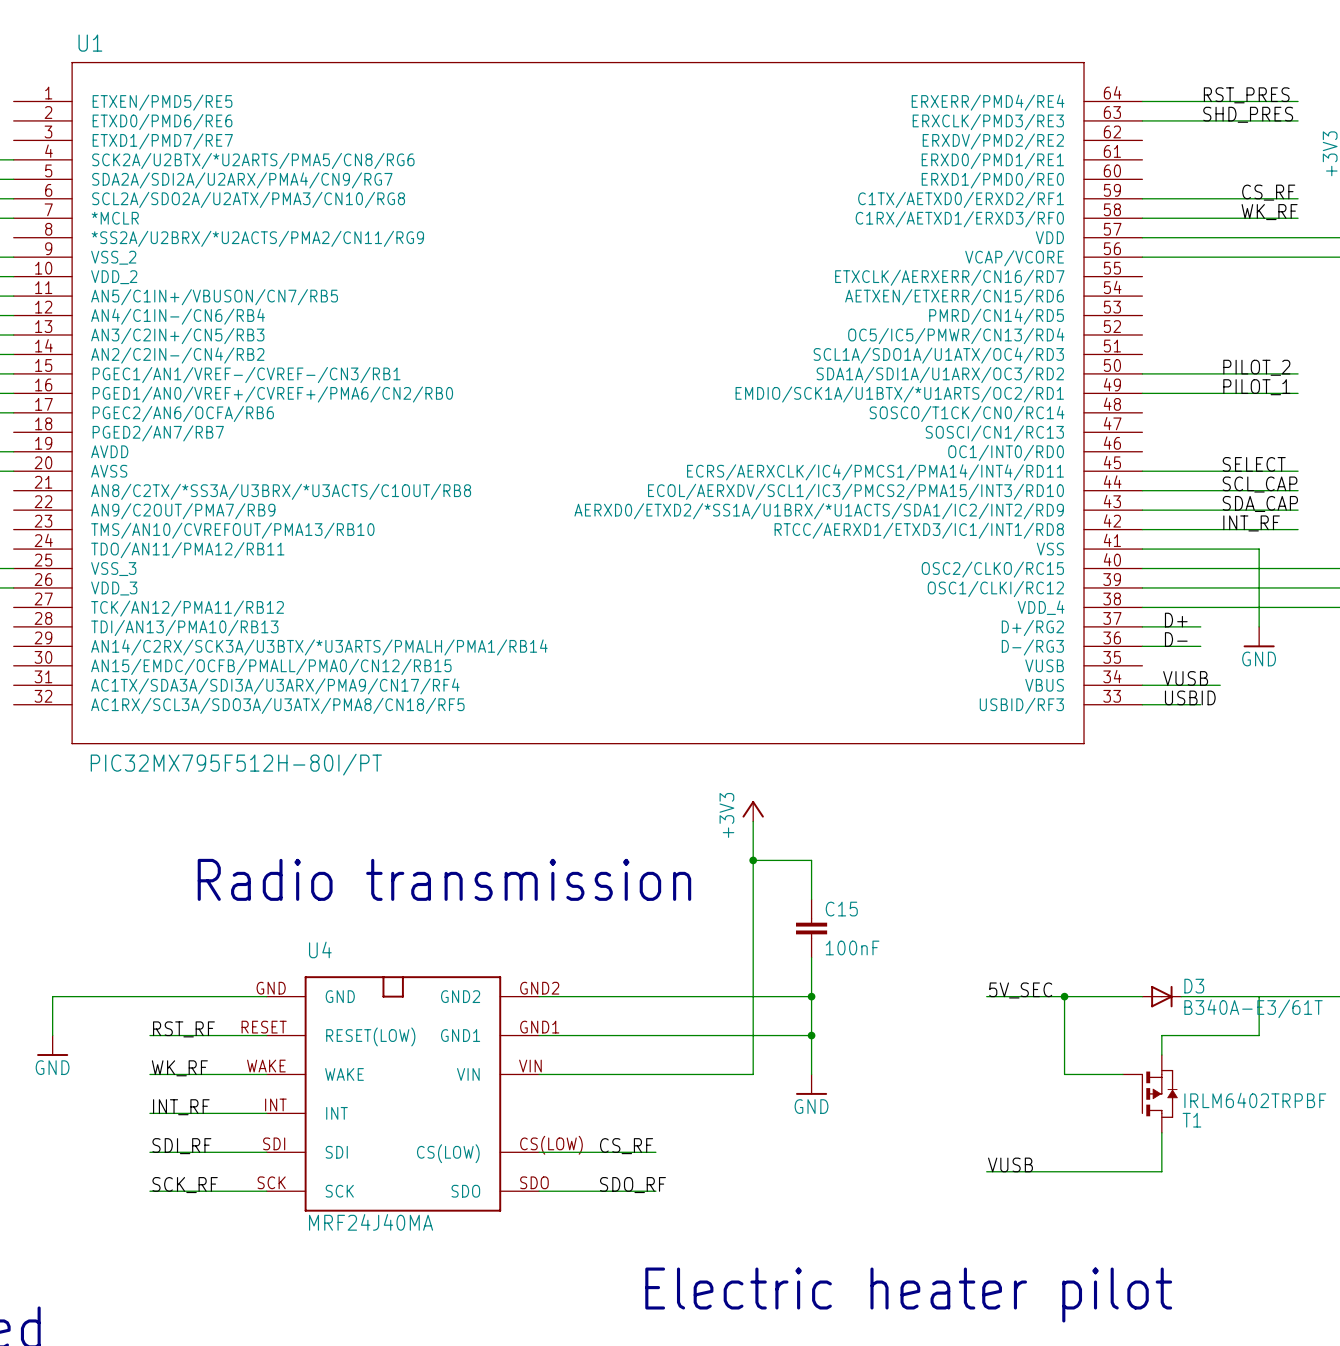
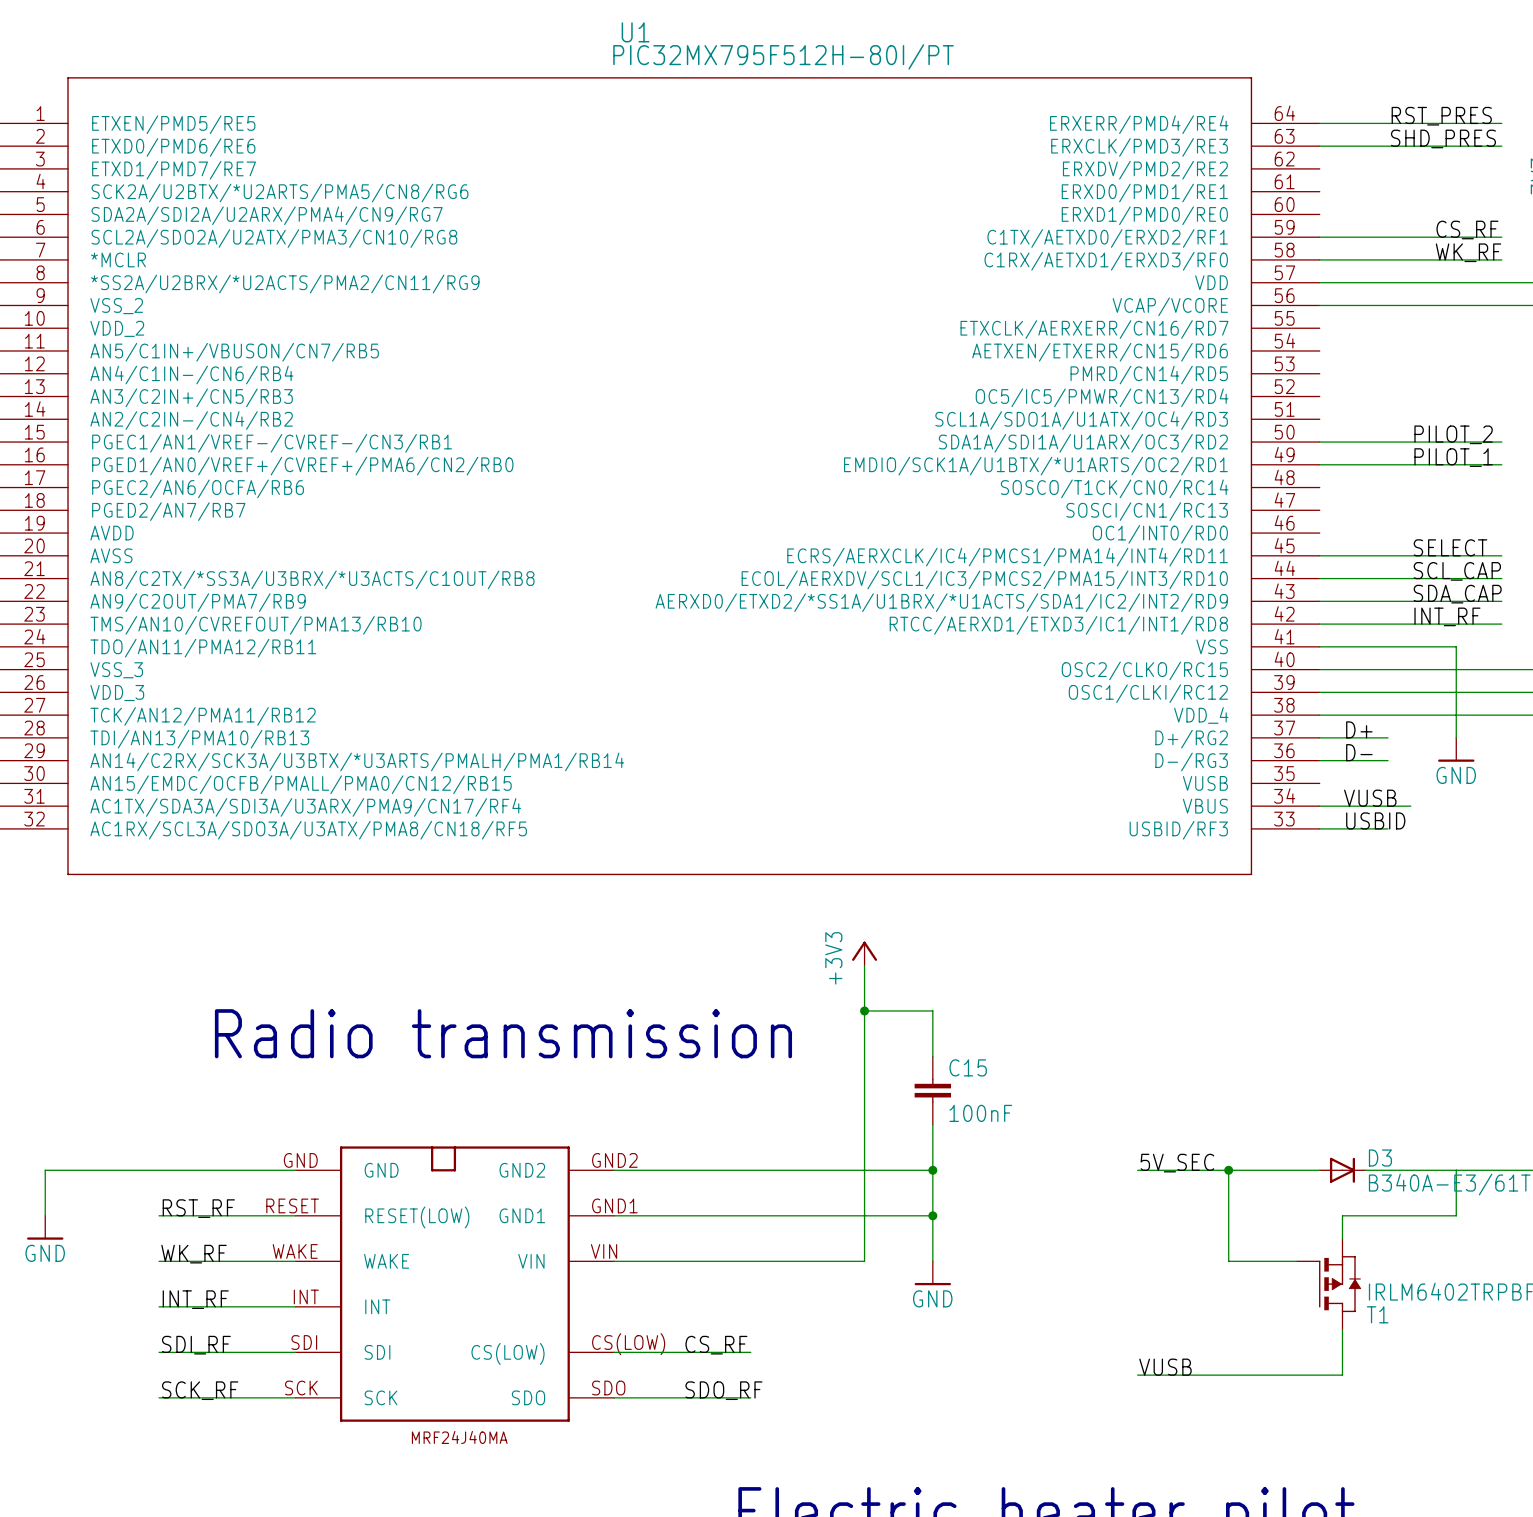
U1 name position: U1 (90, 43) -> U1 (635, 32)
U1 value position: PIC32MX795F512H-80I/PT (236, 764) -> PIC32MX795F512H-80I/PT (783, 56)
U4 name: U4 (320, 949) -> none
U4 value: MRF24J40MA (371, 1222) -> none
U4 text: none -> MRF24J40MA (459, 1437)

